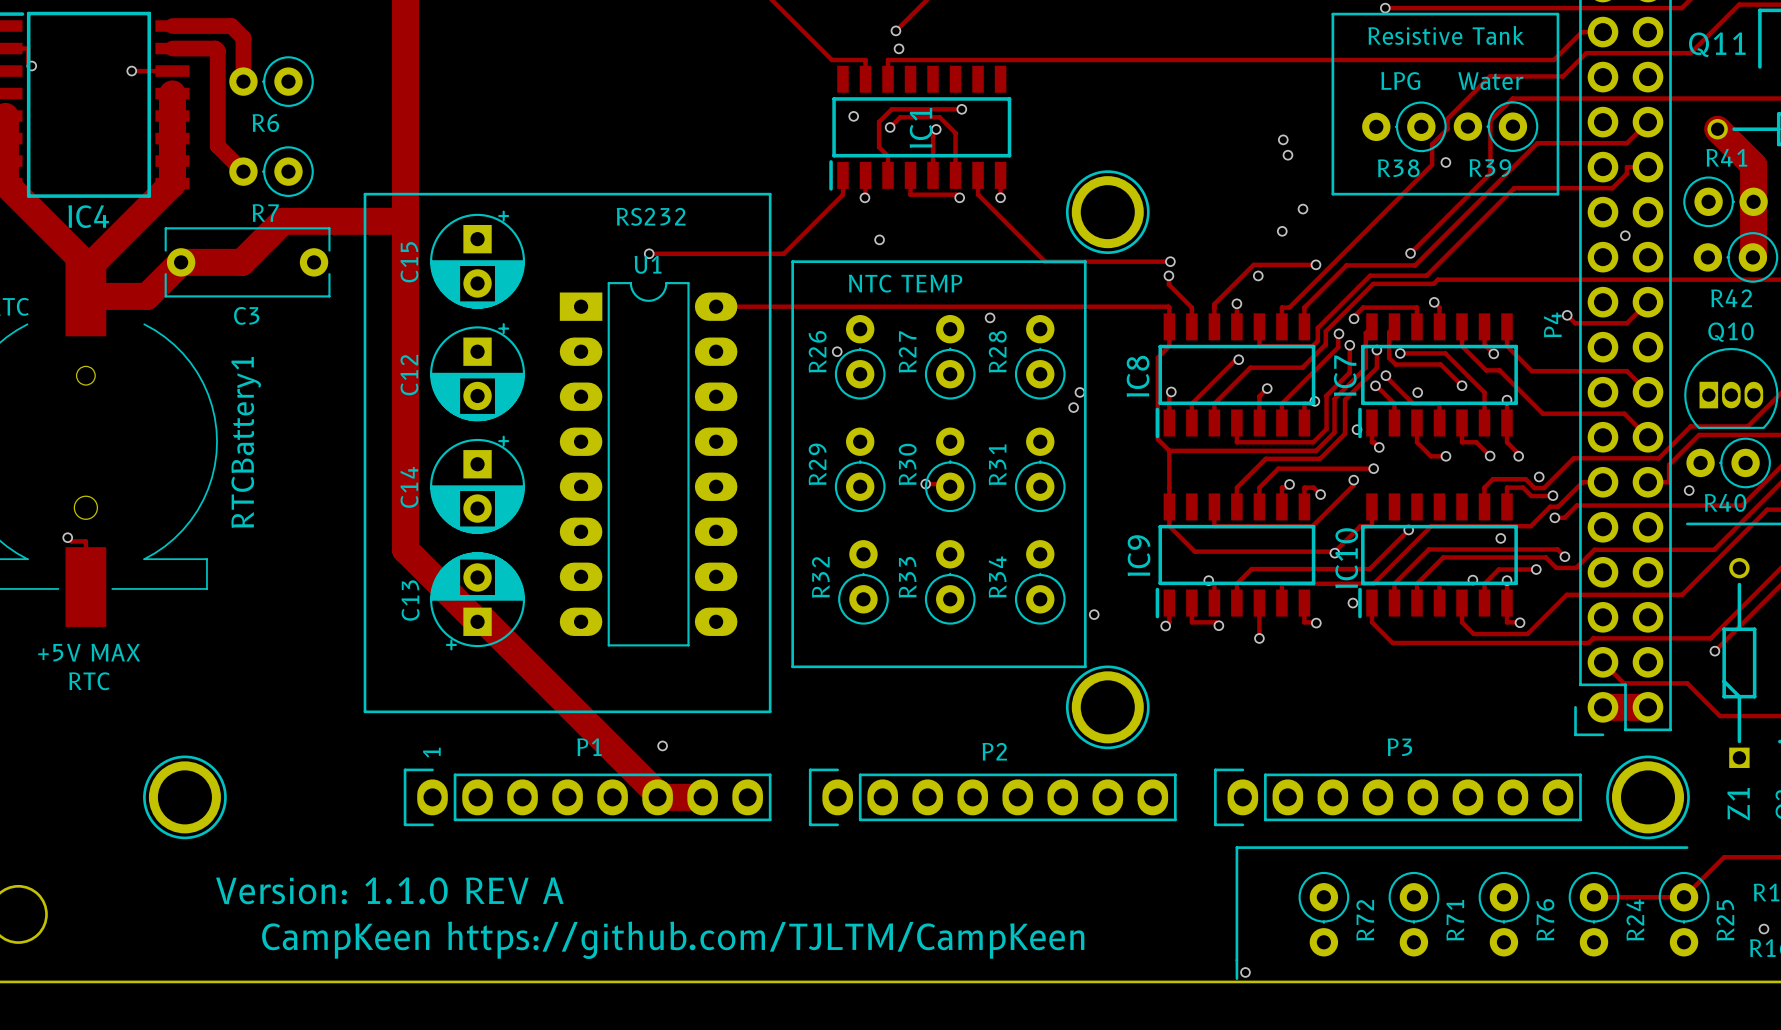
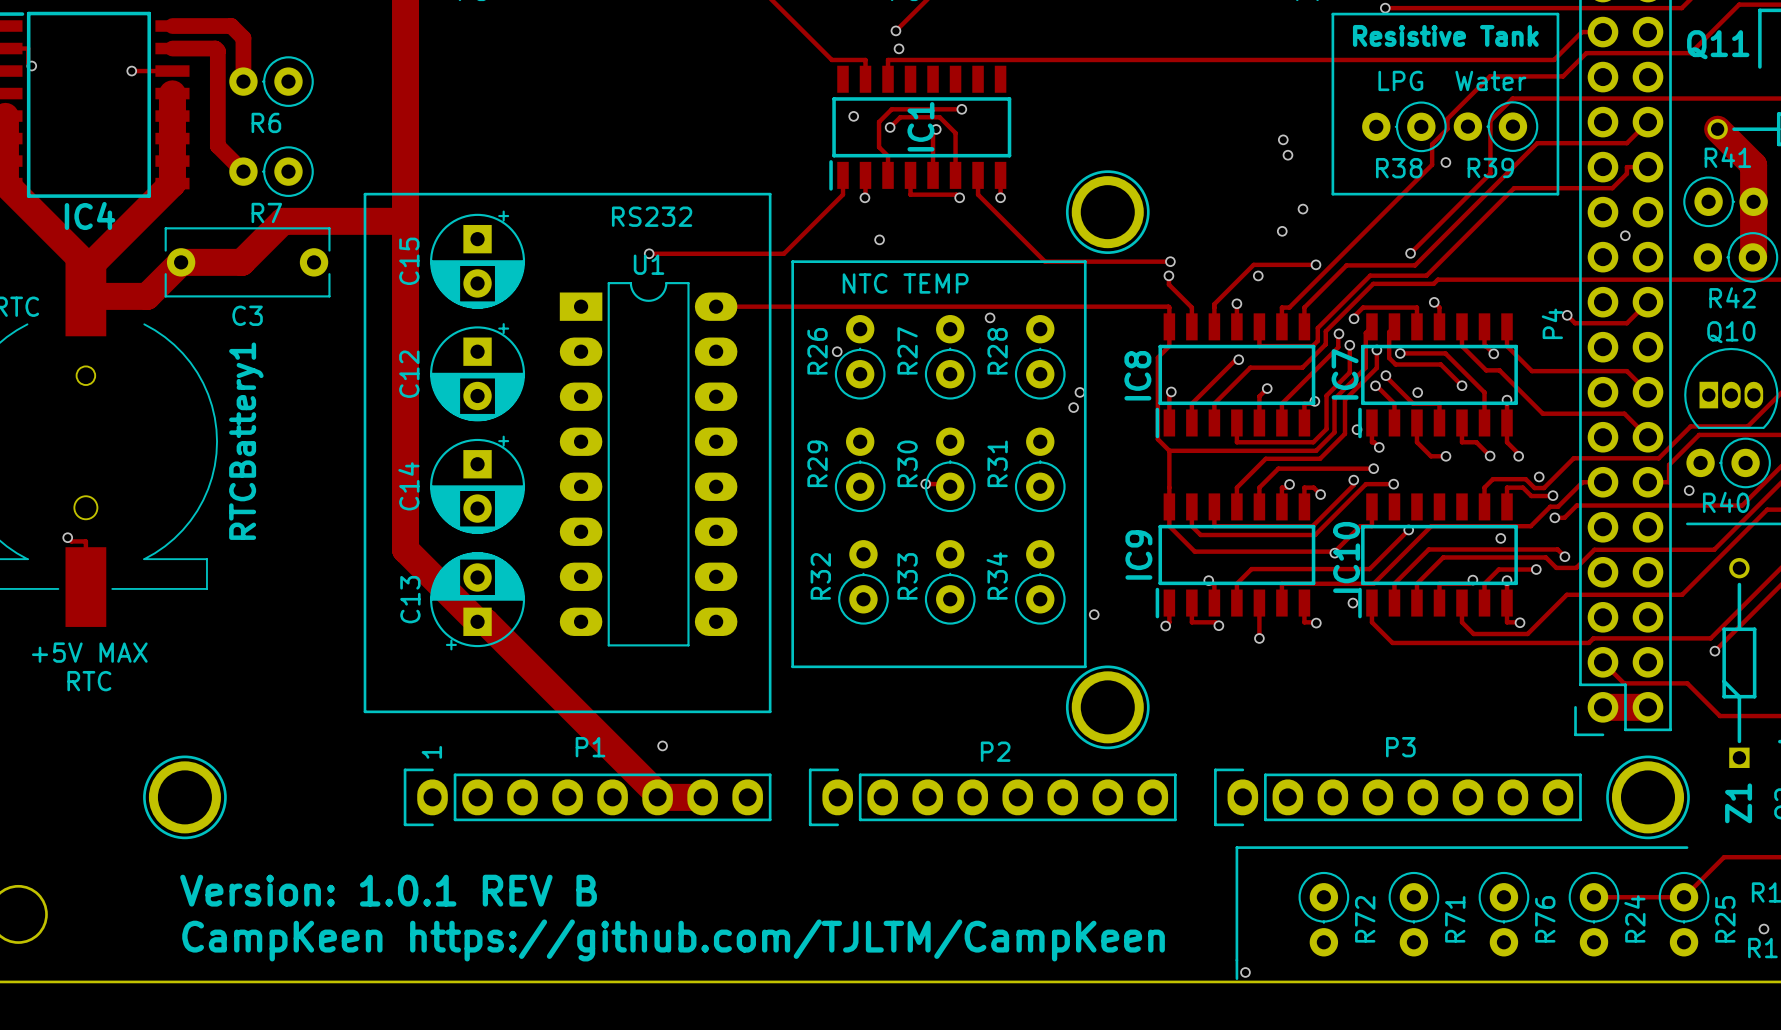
track: none -> (1393, 484) (1366, 484) (1315, 535) (1200, 535) (1191, 526) (1191, 506)
via: none -> (1393, 484)
text: Version: 1.1.0 REV A (389, 890) -> Version: 1.0.1 REV B (388, 890)

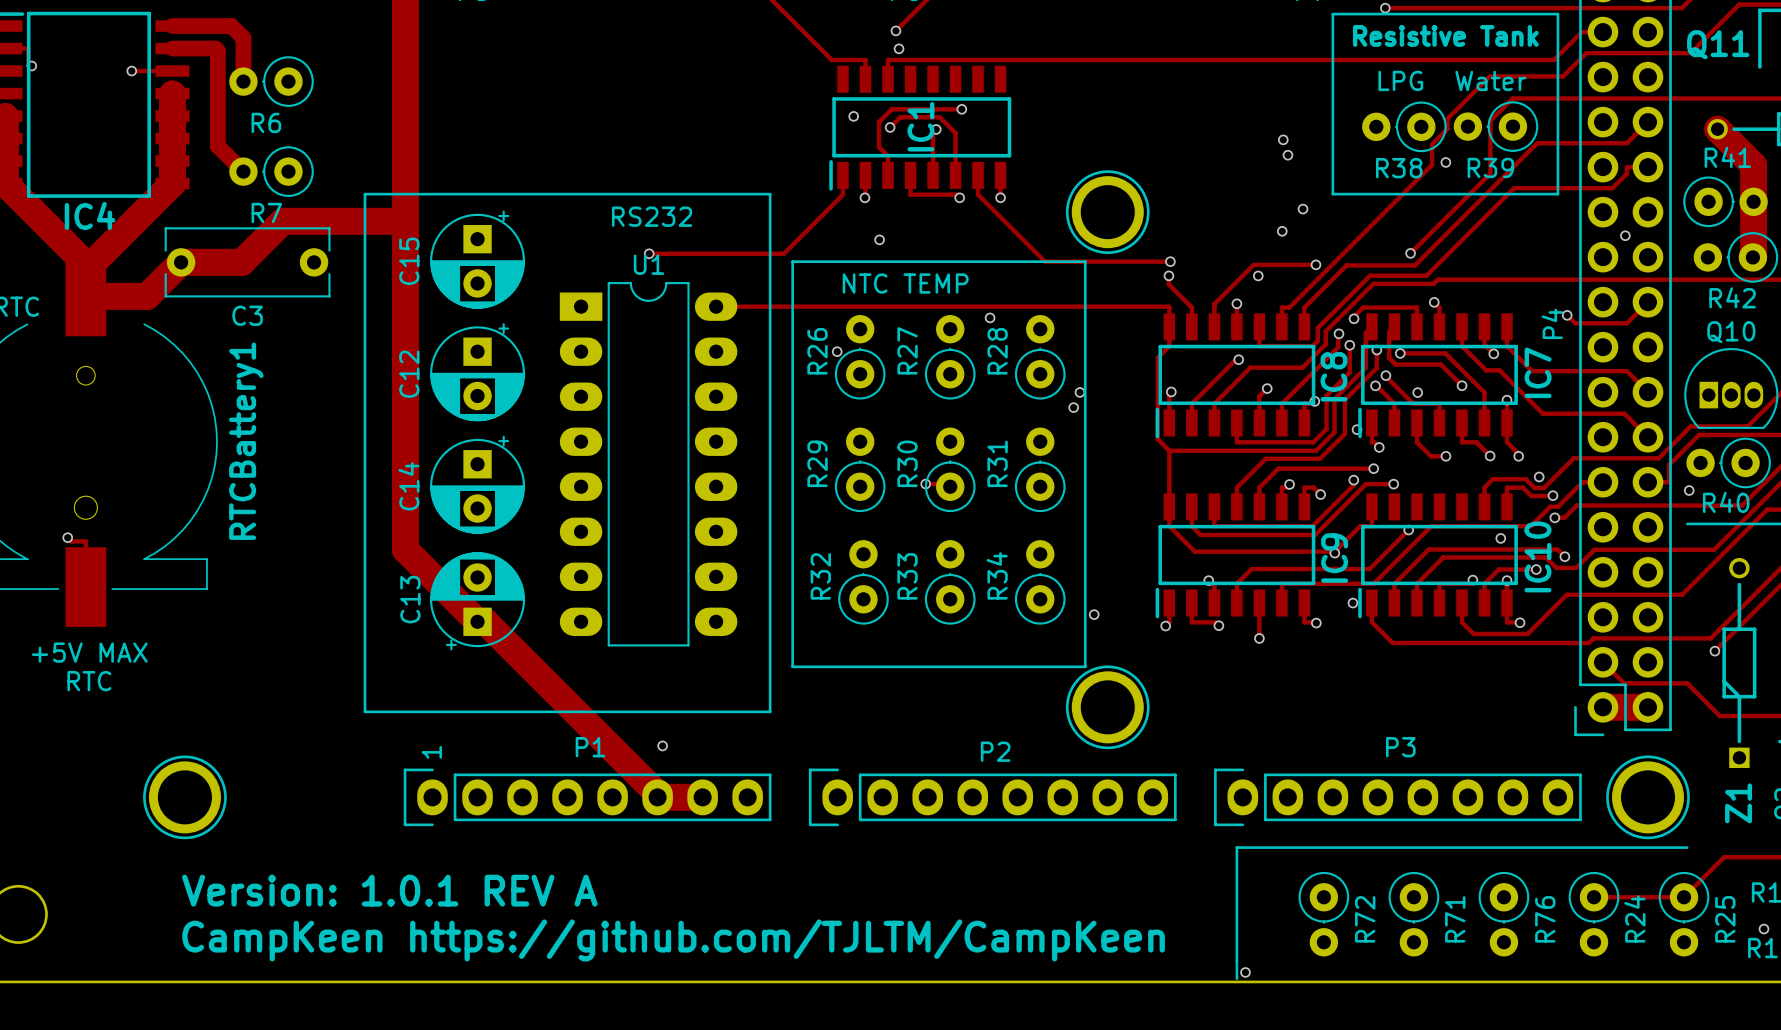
IC7 name position: IC7 (1345, 374) -> IC7 (1538, 372)
IC8 name position: IC8 (1137, 375) -> IC8 (1333, 376)
IC9 name position: IC9 (1138, 554) -> IC9 (1334, 558)
IC10 name position: IC10 (1346, 557) -> IC10 (1537, 556)
text: Version: 1.0.1 REV B (388, 890) -> Version: 1.0.1 REV A (389, 890)

